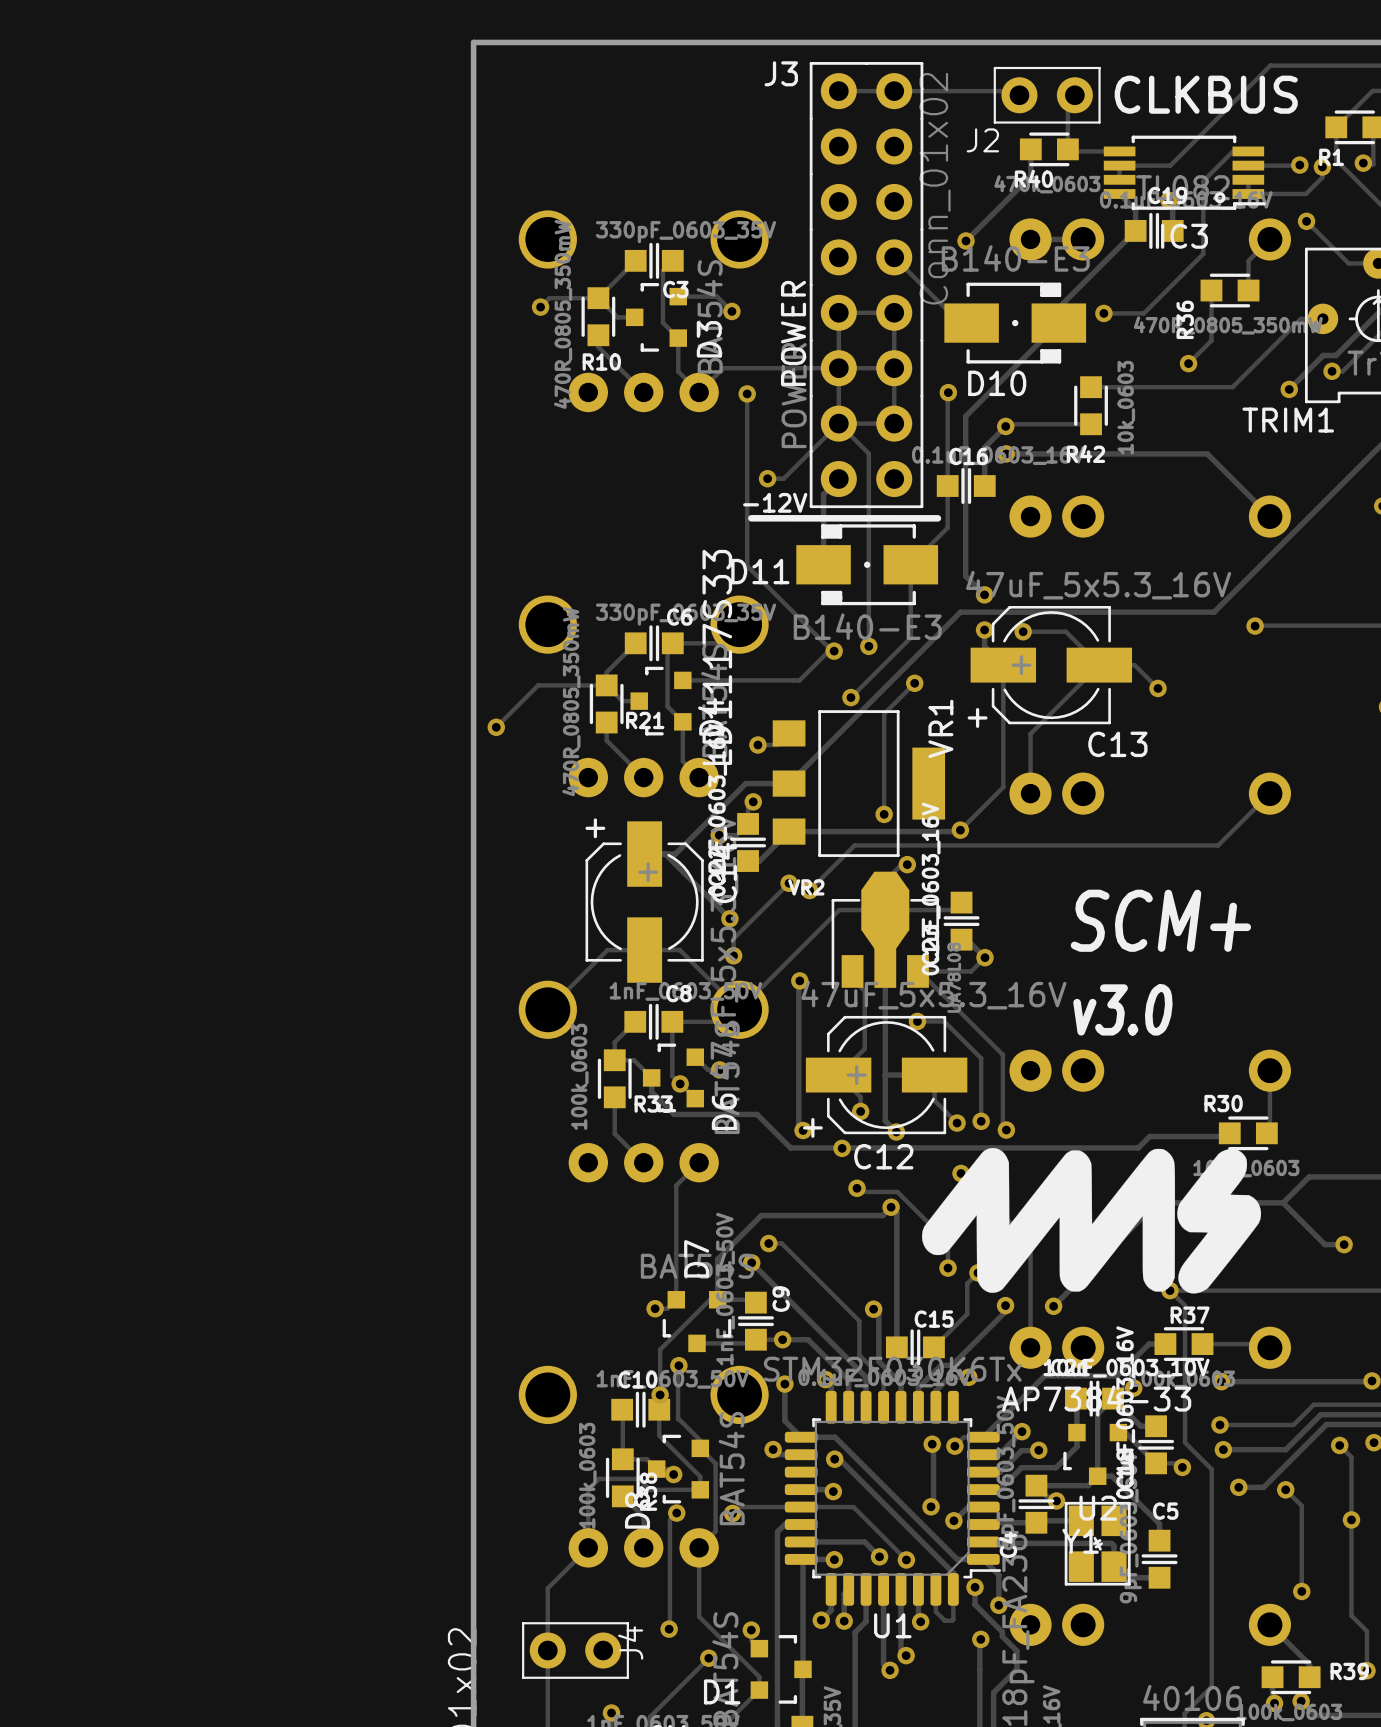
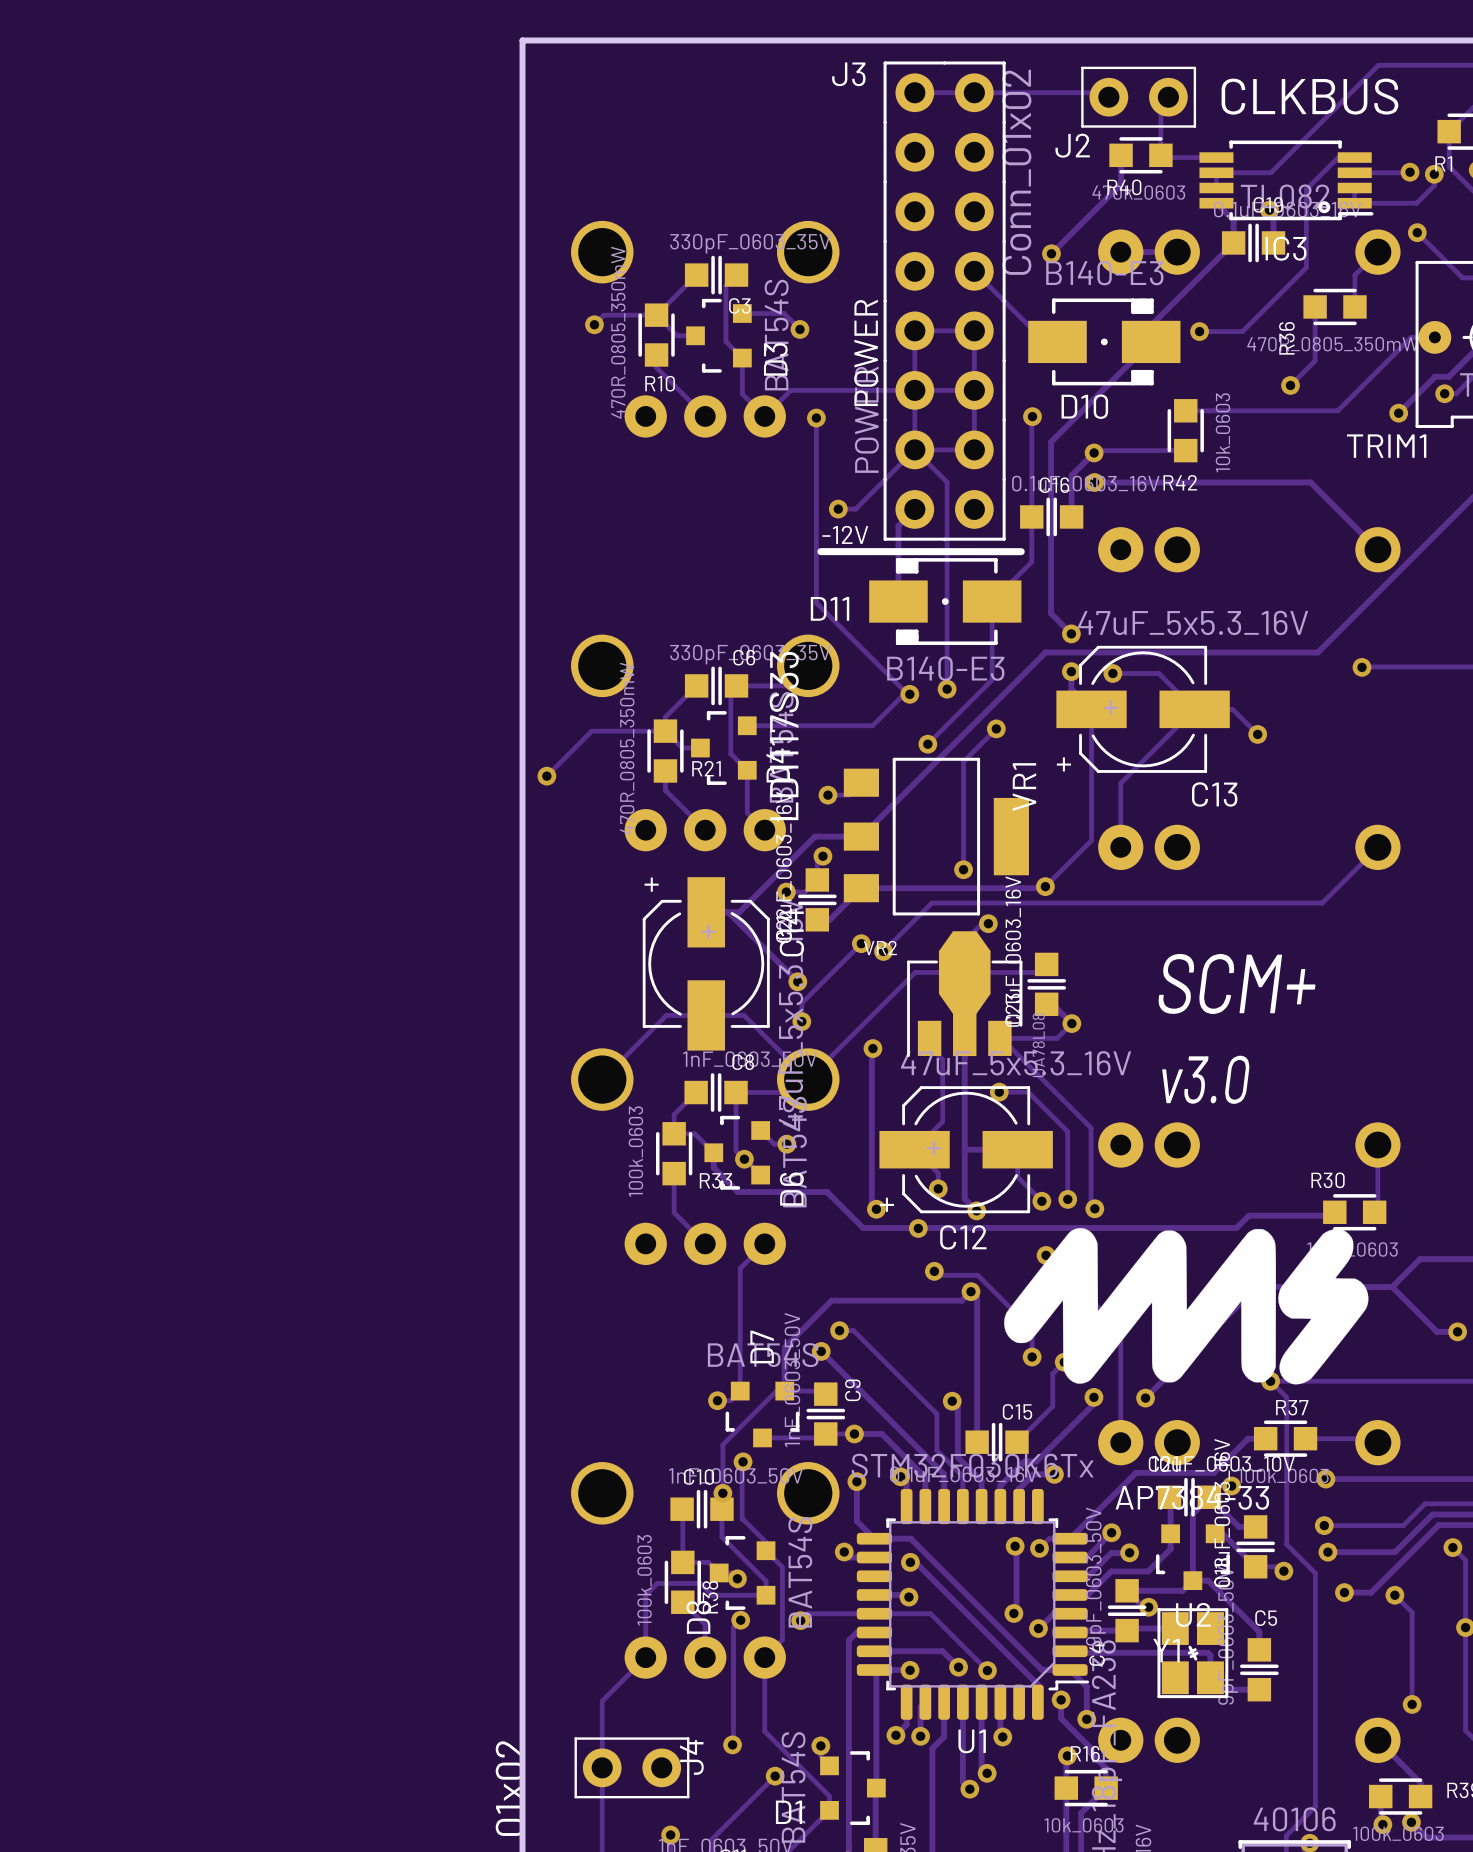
track: (935, 1589) (935, 1611) (944, 1620) (953, 1619) (953, 1589) -> none
R16: none -> 10k_0603 (1086, 1788)

